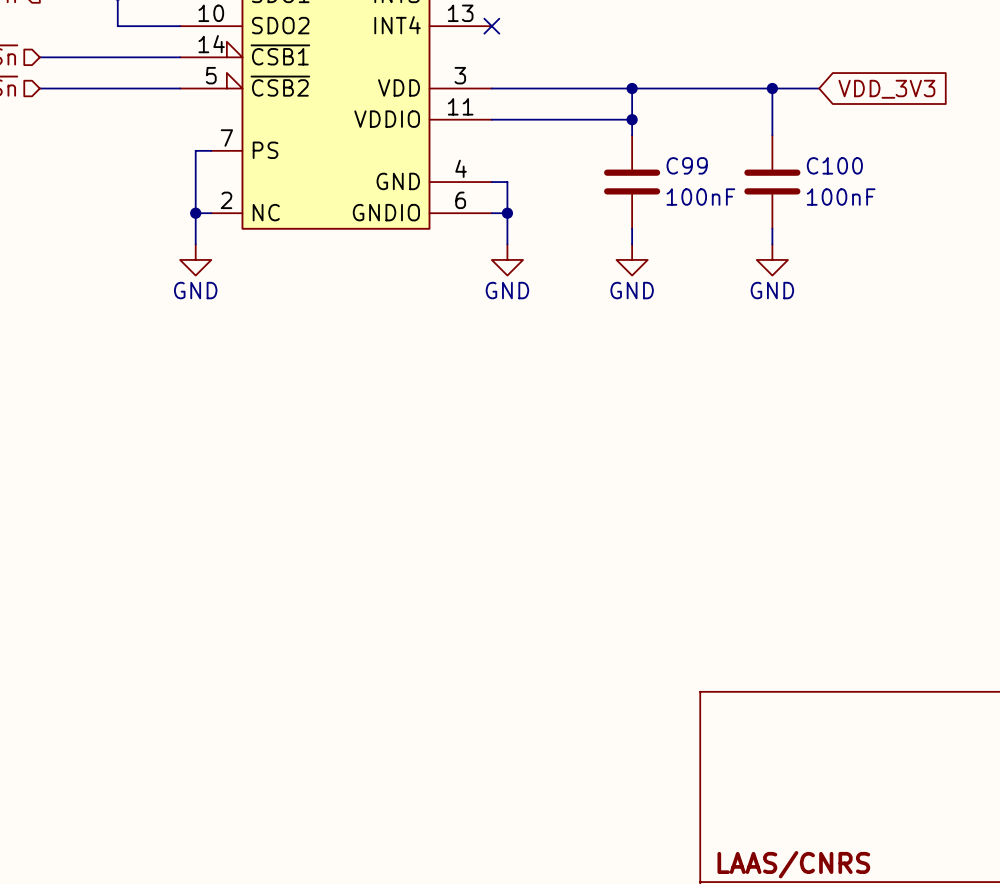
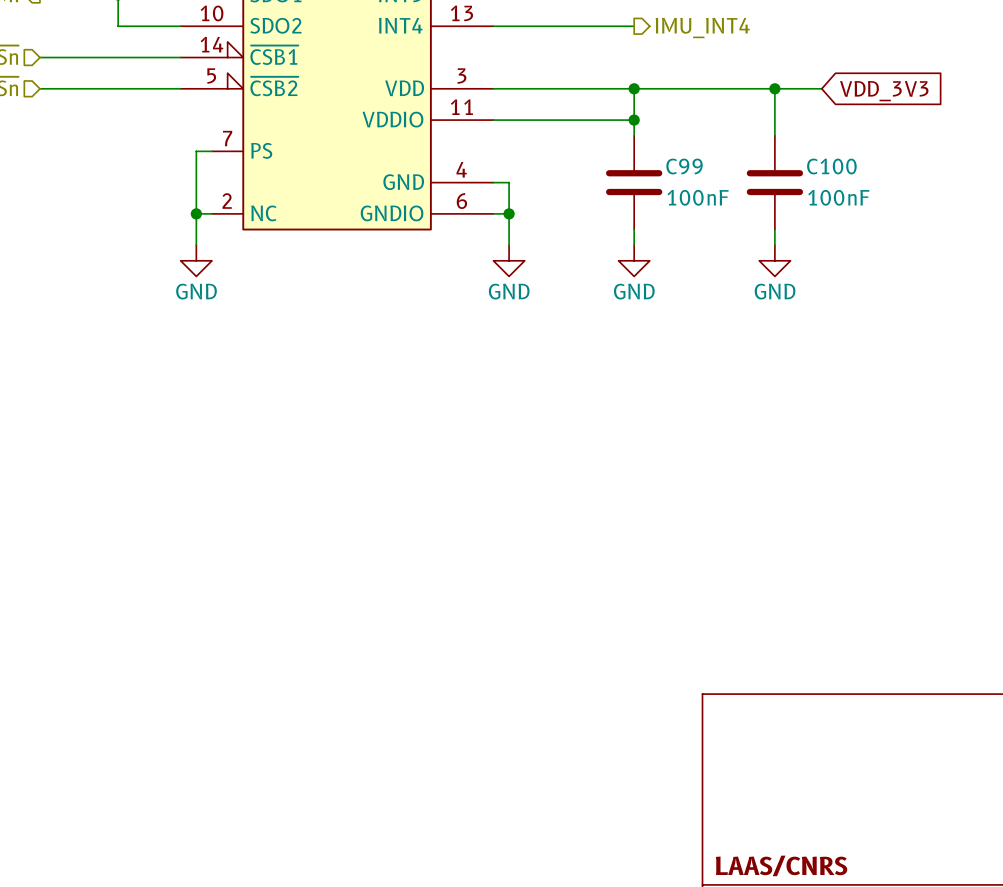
hierarchical label: none -> IMU_INT4 (702, 28)
wire: none -> (493, 26) (634, 26)
no-connect mark: (491, 26) -> none

